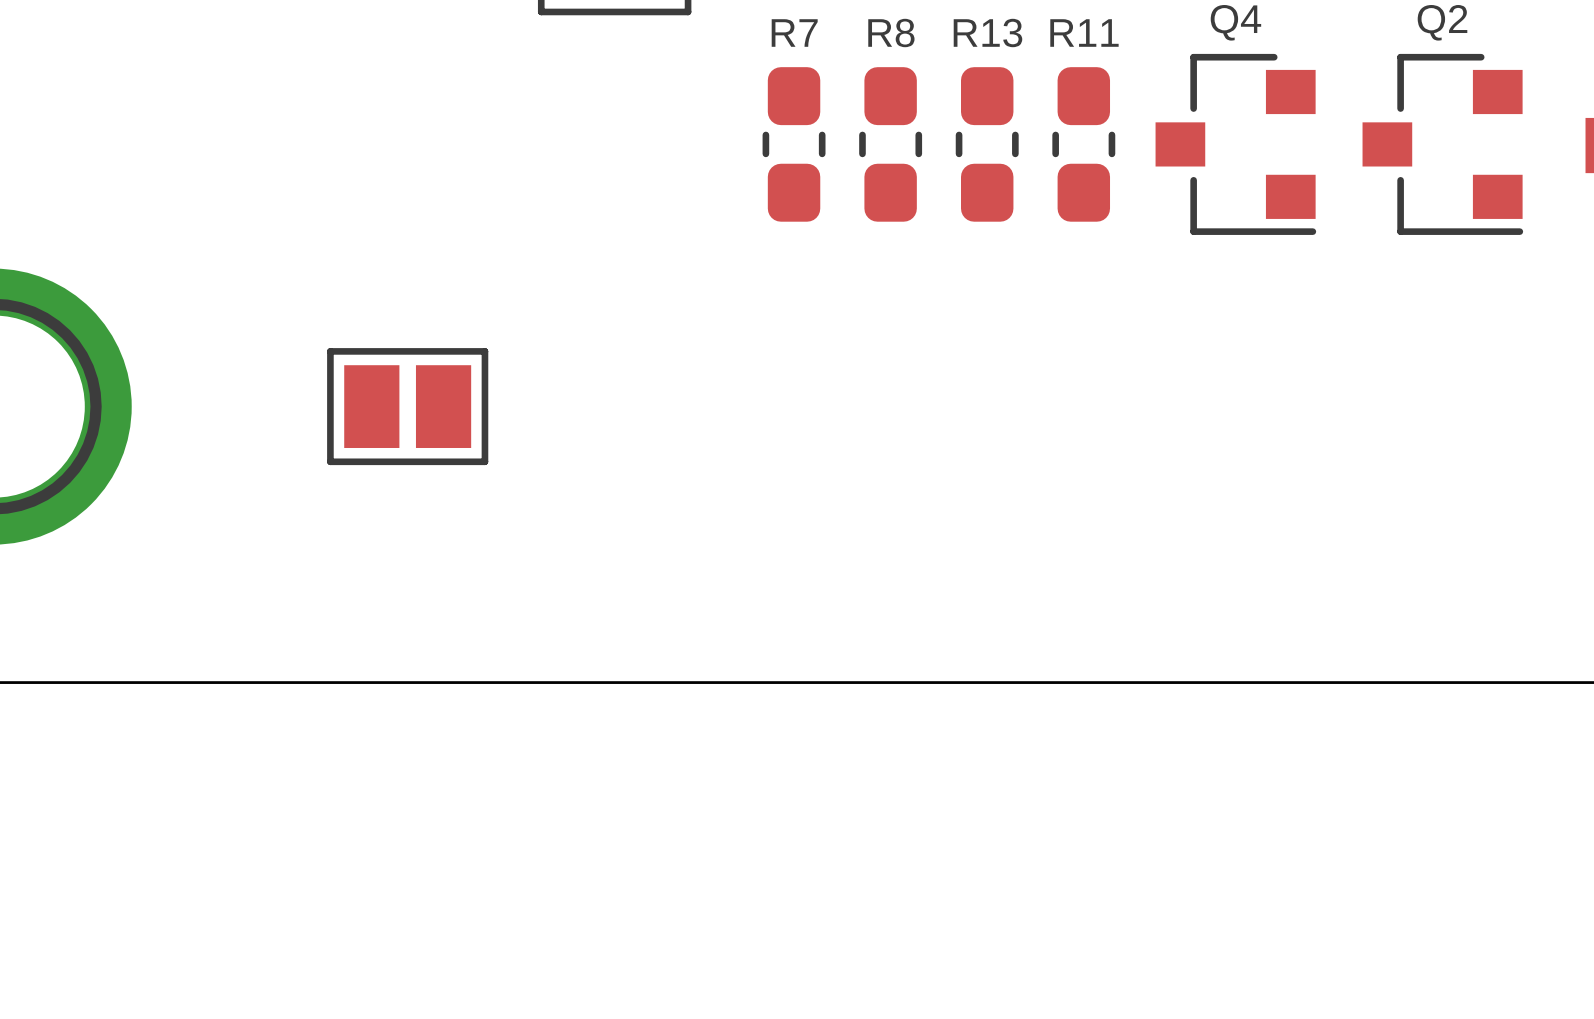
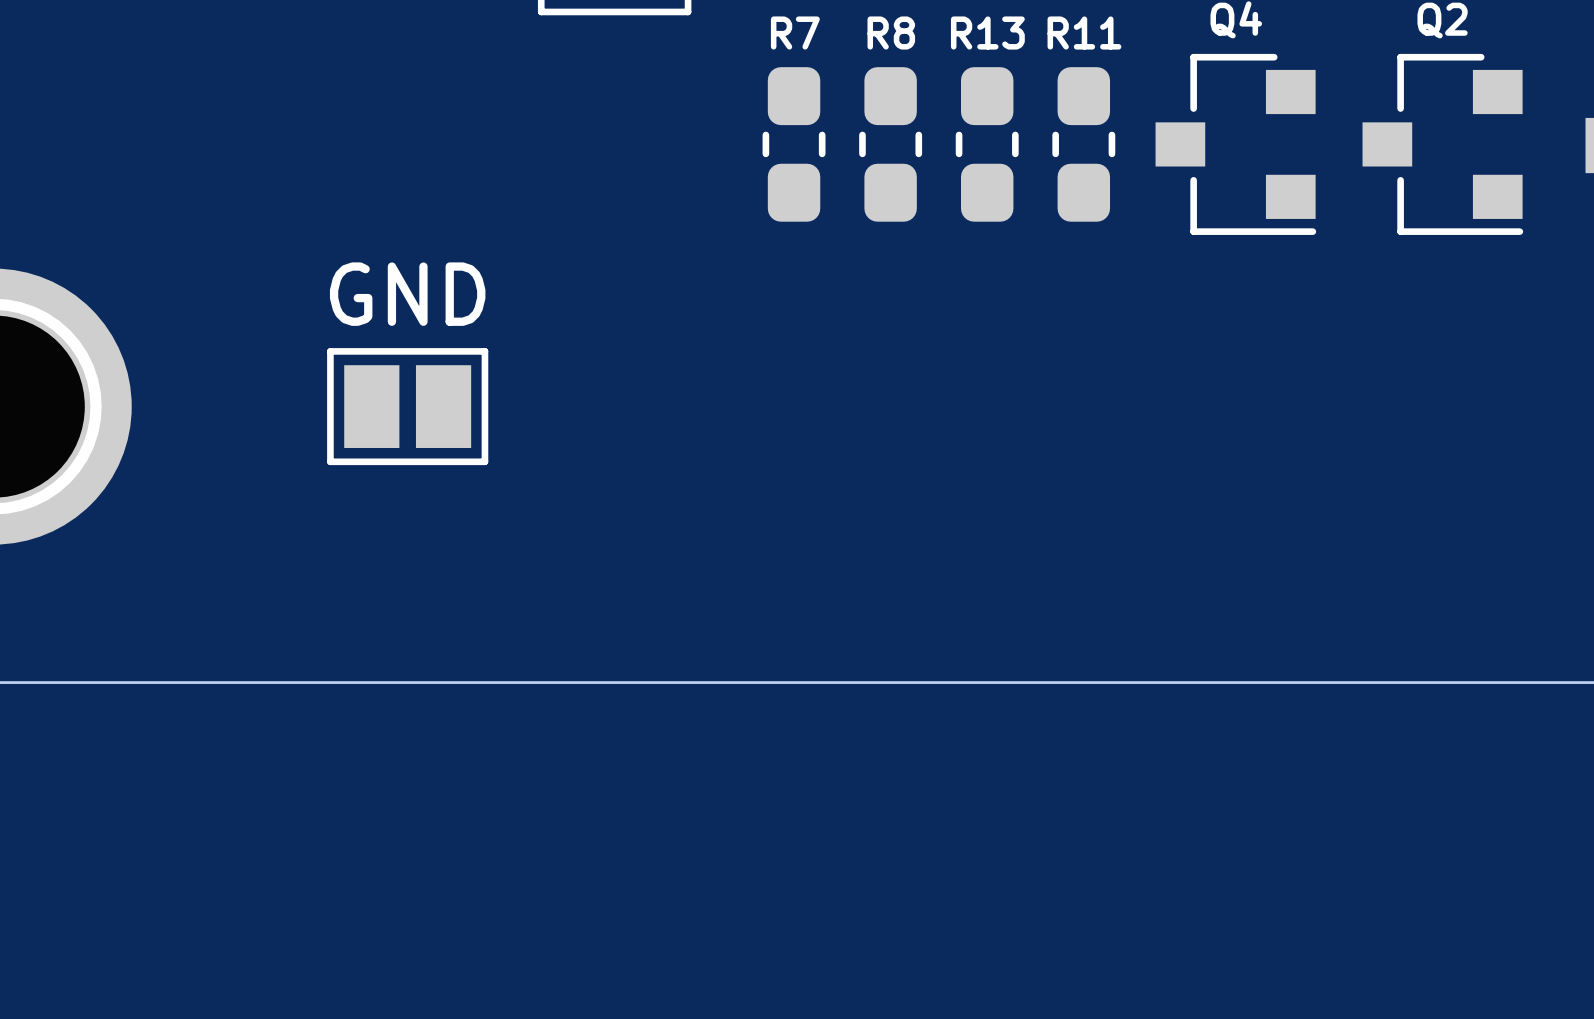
text: none -> GND (407, 294)

